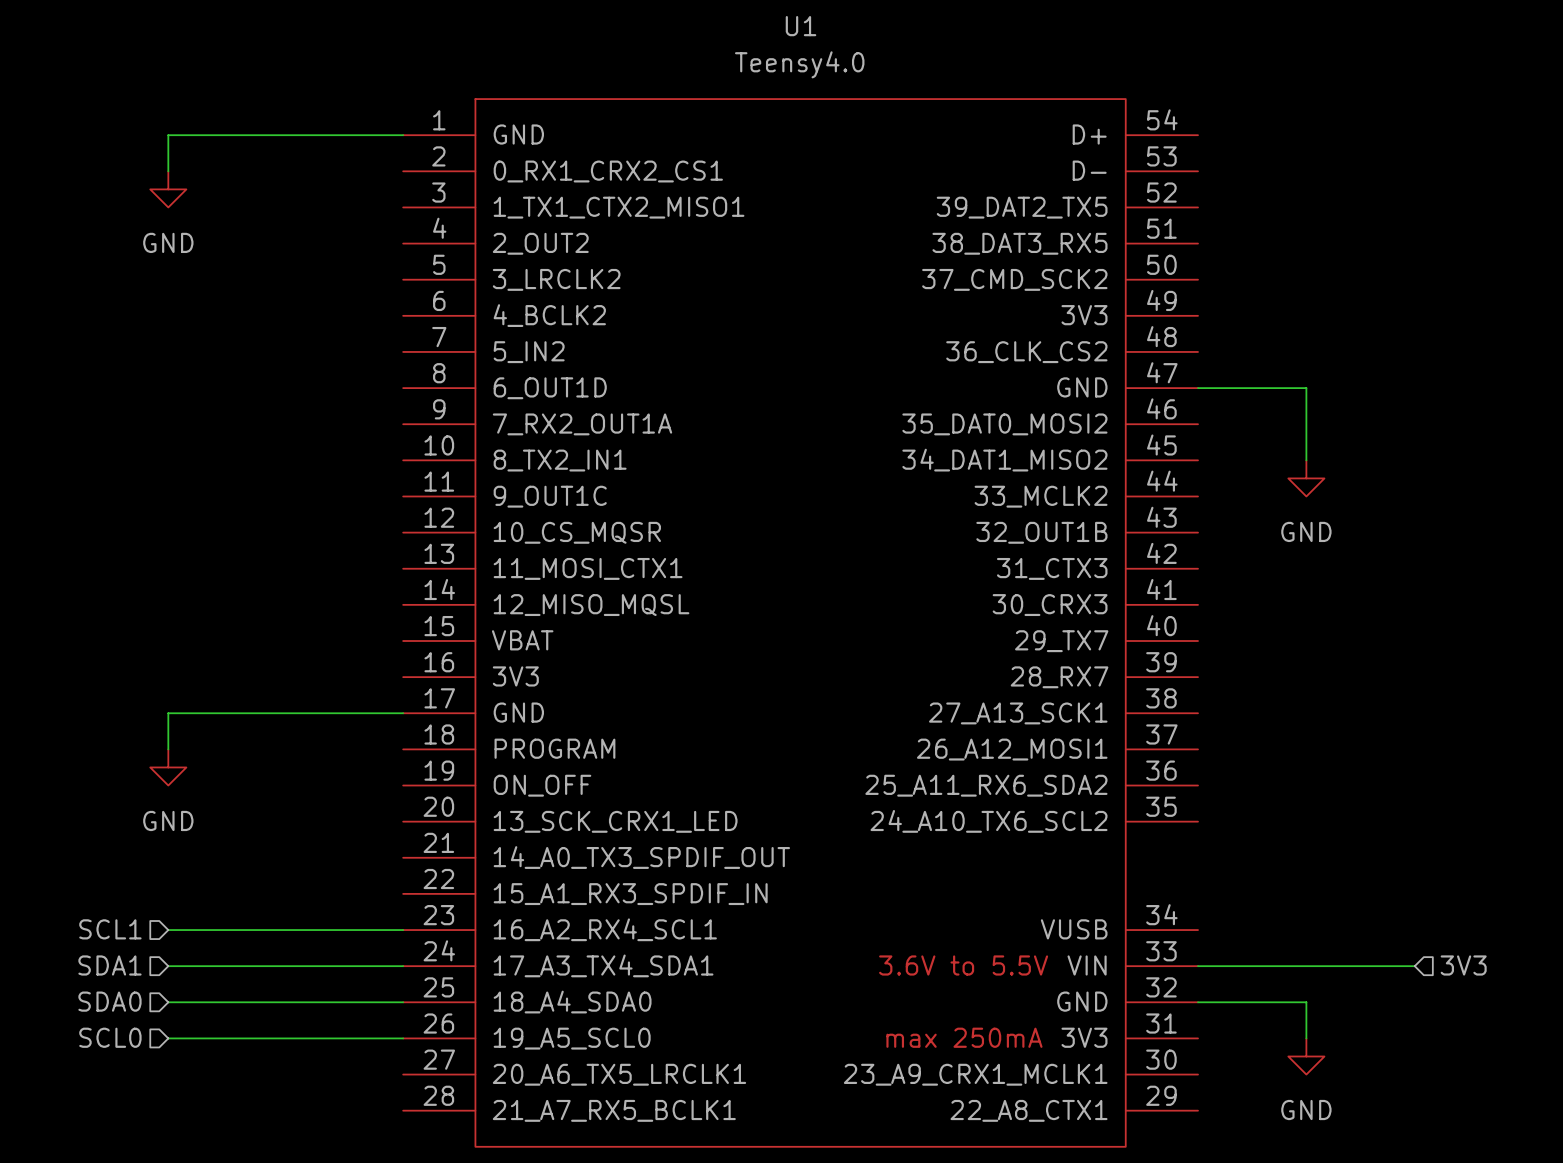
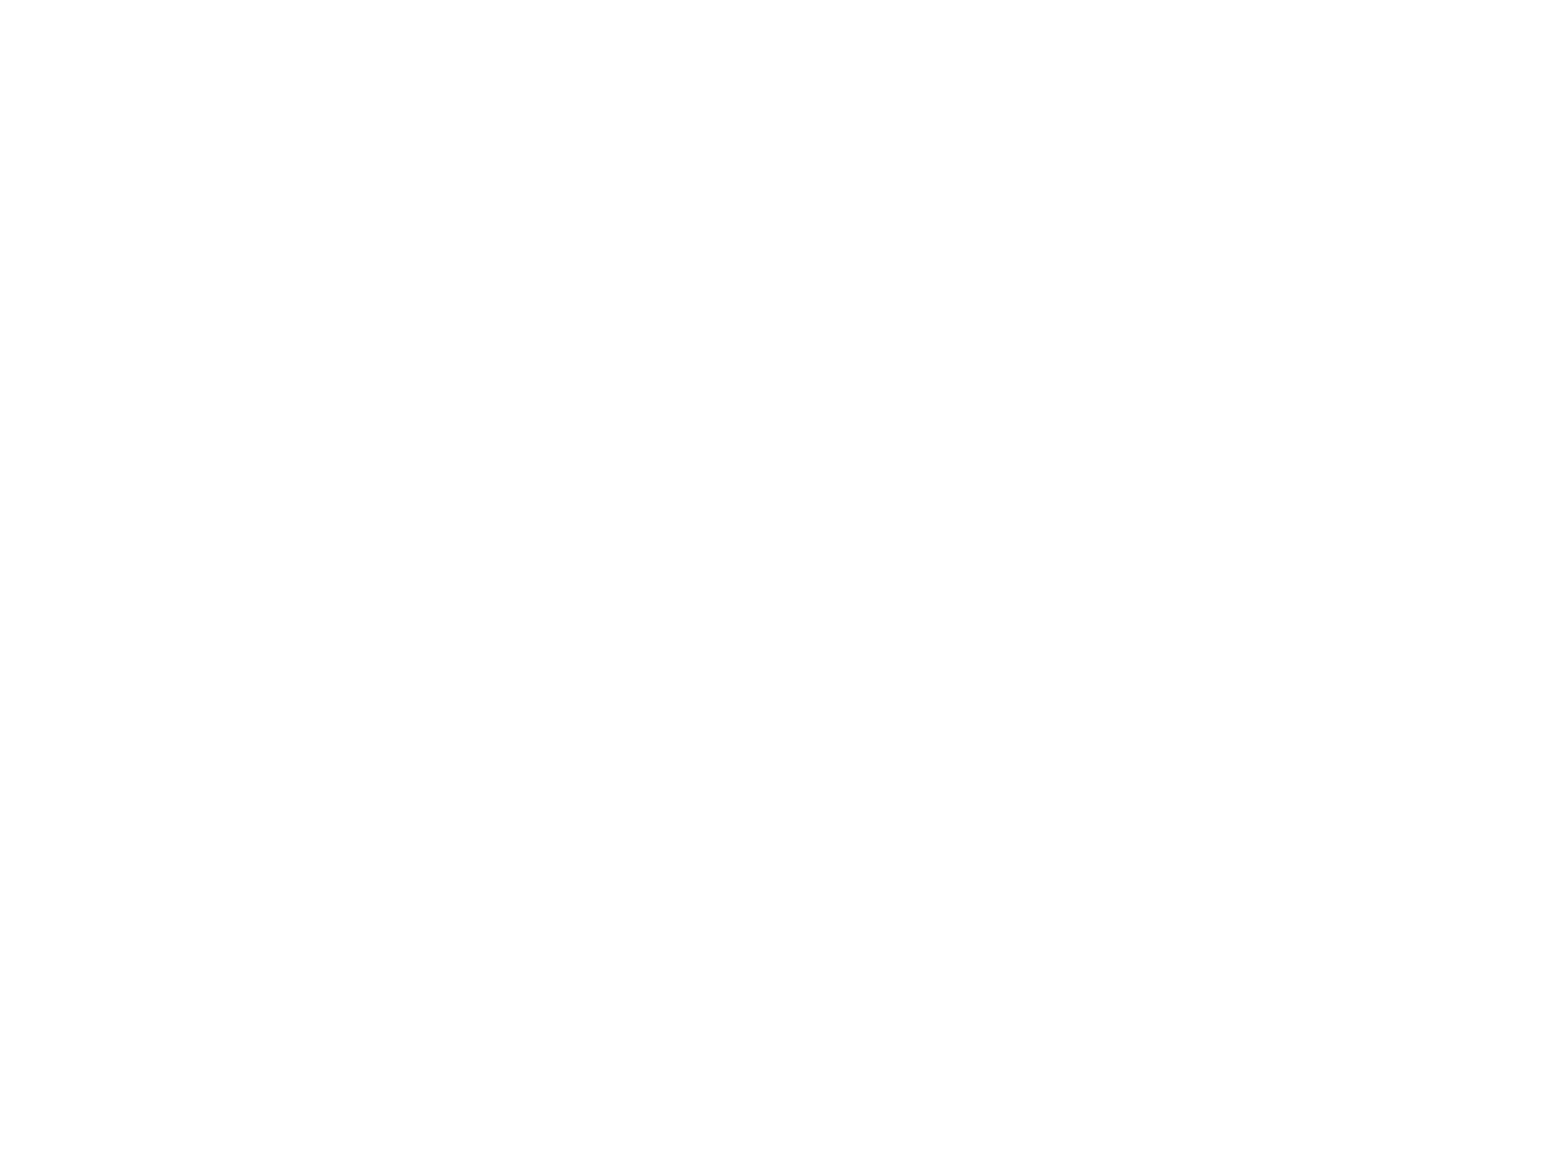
wire: (403, 135) (168, 135) (168, 171) -> none
power symbol: GND (168, 189) -> none
wire: (1198, 388) (1306, 388) (1306, 460) -> none
power symbol: GND (1306, 478) -> none
U1: Teensy4.0 (800, 622) -> none
wire: (403, 713) (168, 713) (168, 749) -> none
power symbol: GND (168, 767) -> none
hierarchical label: SCL1 (110, 929) -> none
wire: (168, 930) (403, 930) -> none
hierarchical label: SDA1 (109, 965) -> none
hierarchical label: 3V3 (1463, 965) -> none
wire: (168, 966) (403, 966) -> none
wire: (1198, 966) (1414, 966) -> none
hierarchical label: SDA0 (109, 1001) -> none
wire: (168, 1002) (403, 1002) -> none
wire: (1198, 1002) (1306, 1002) (1306, 1038) -> none
hierarchical label: SCL0 (110, 1037) -> none
wire: (168, 1038) (403, 1038) -> none
power symbol: GND (1306, 1056) -> none

